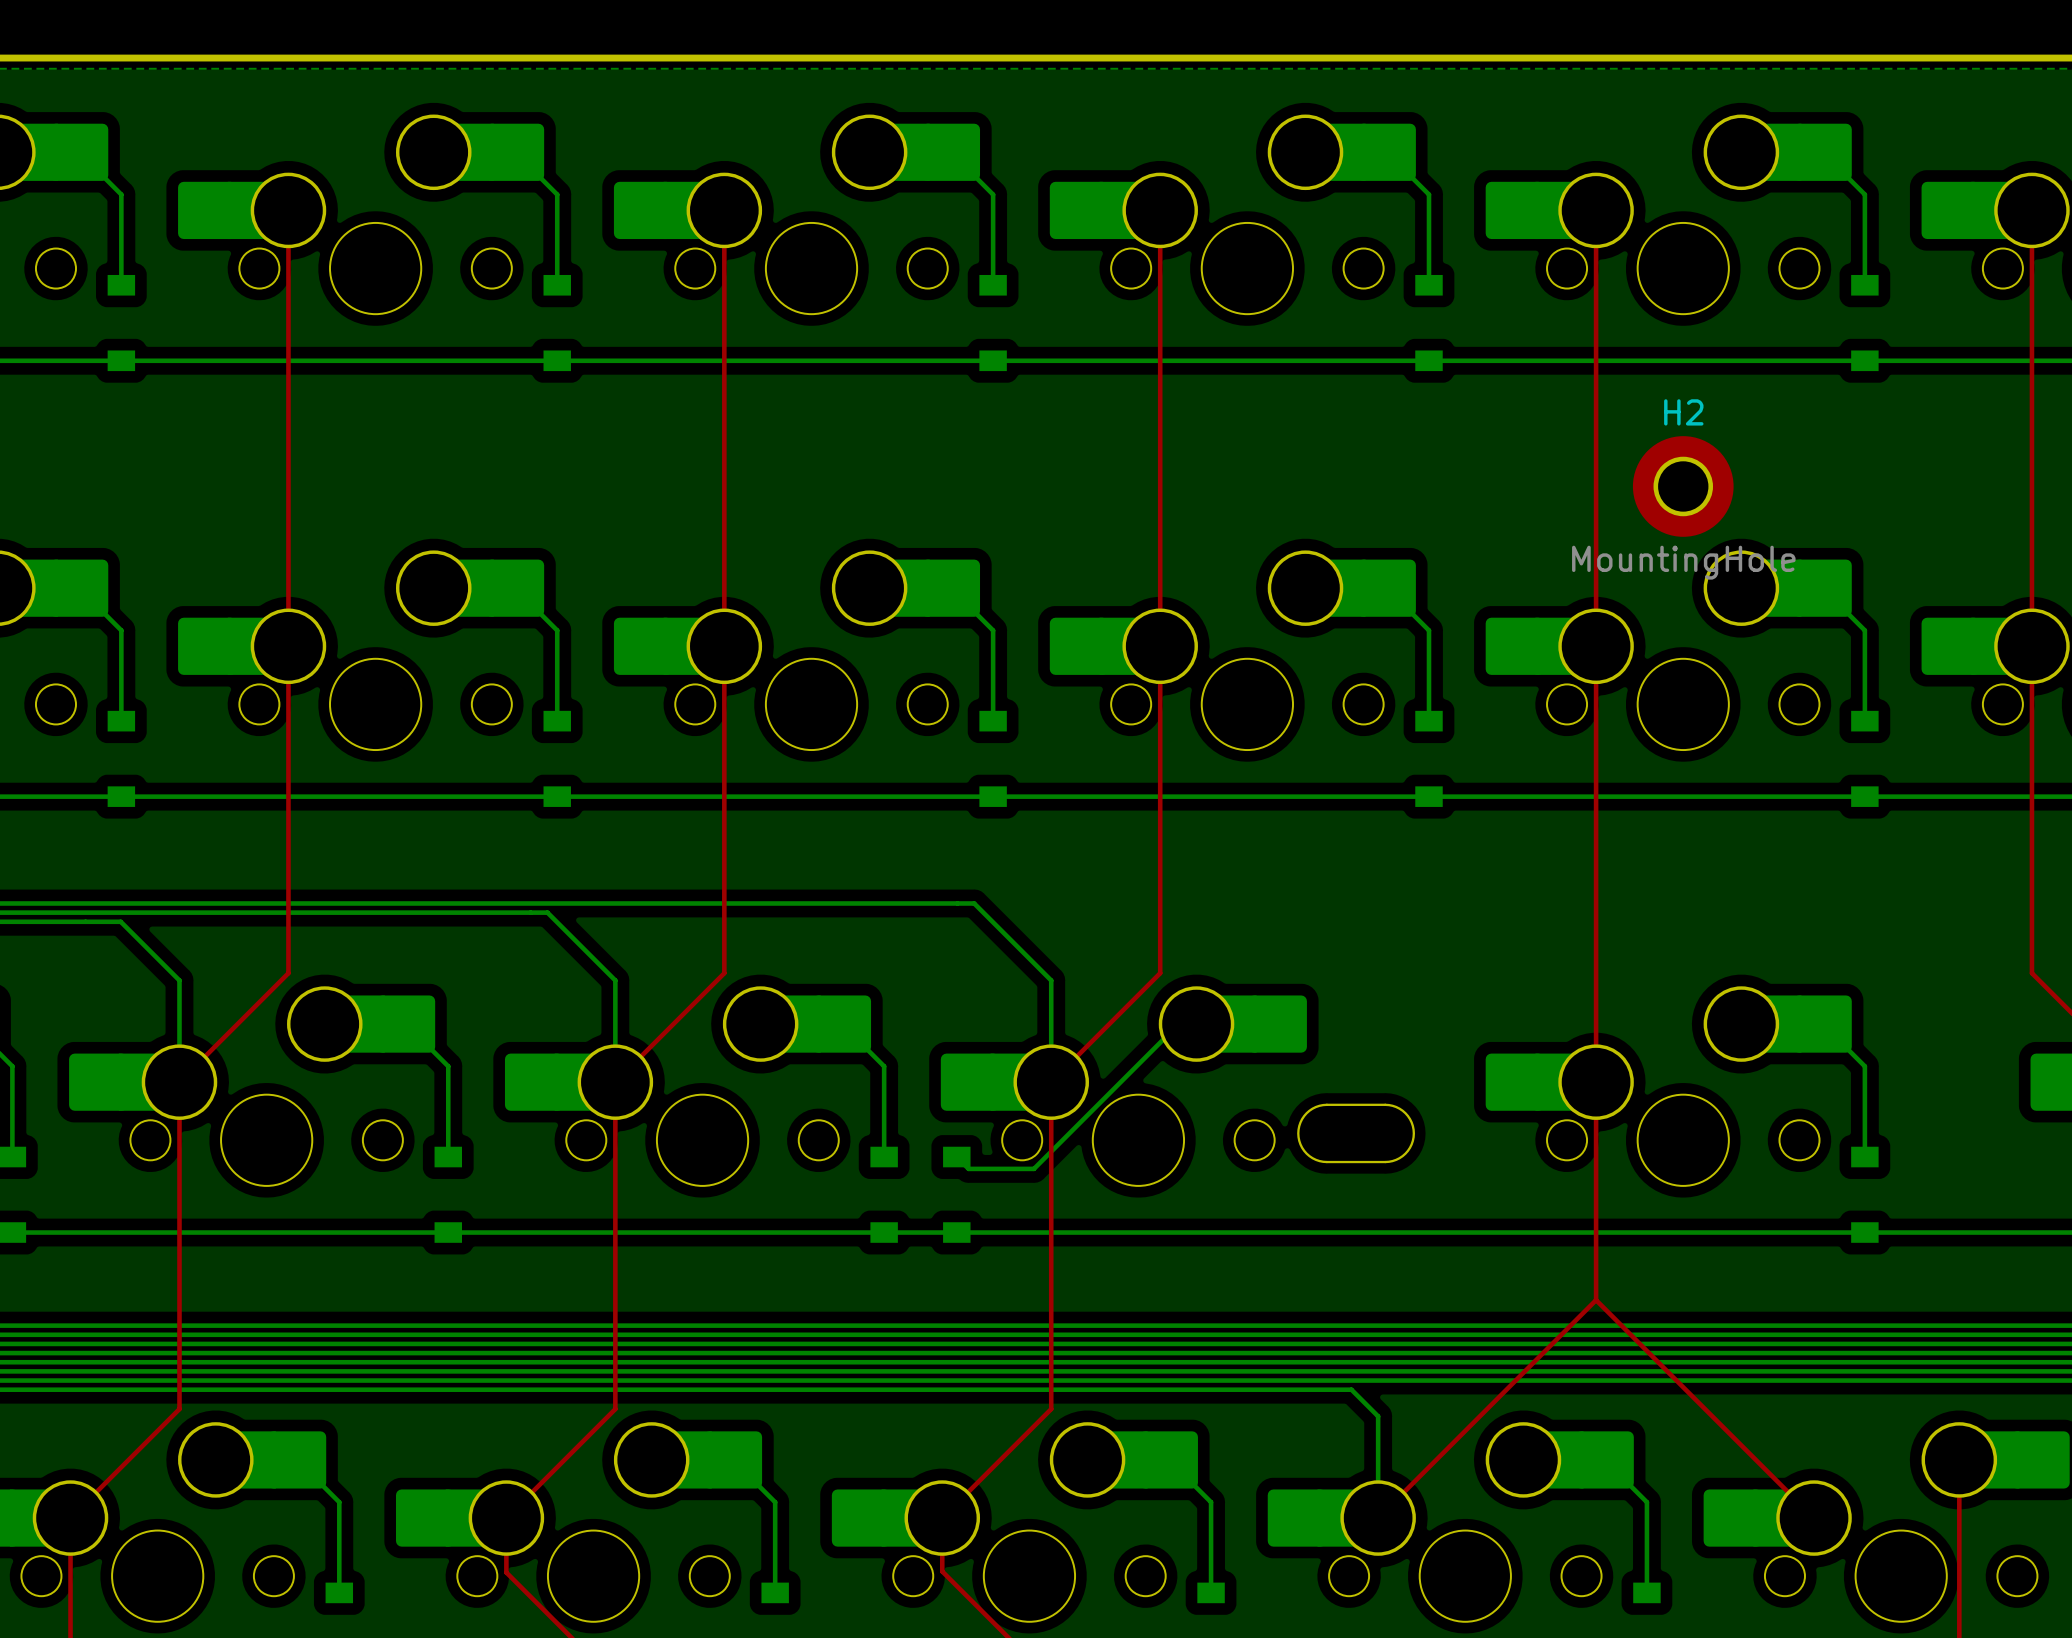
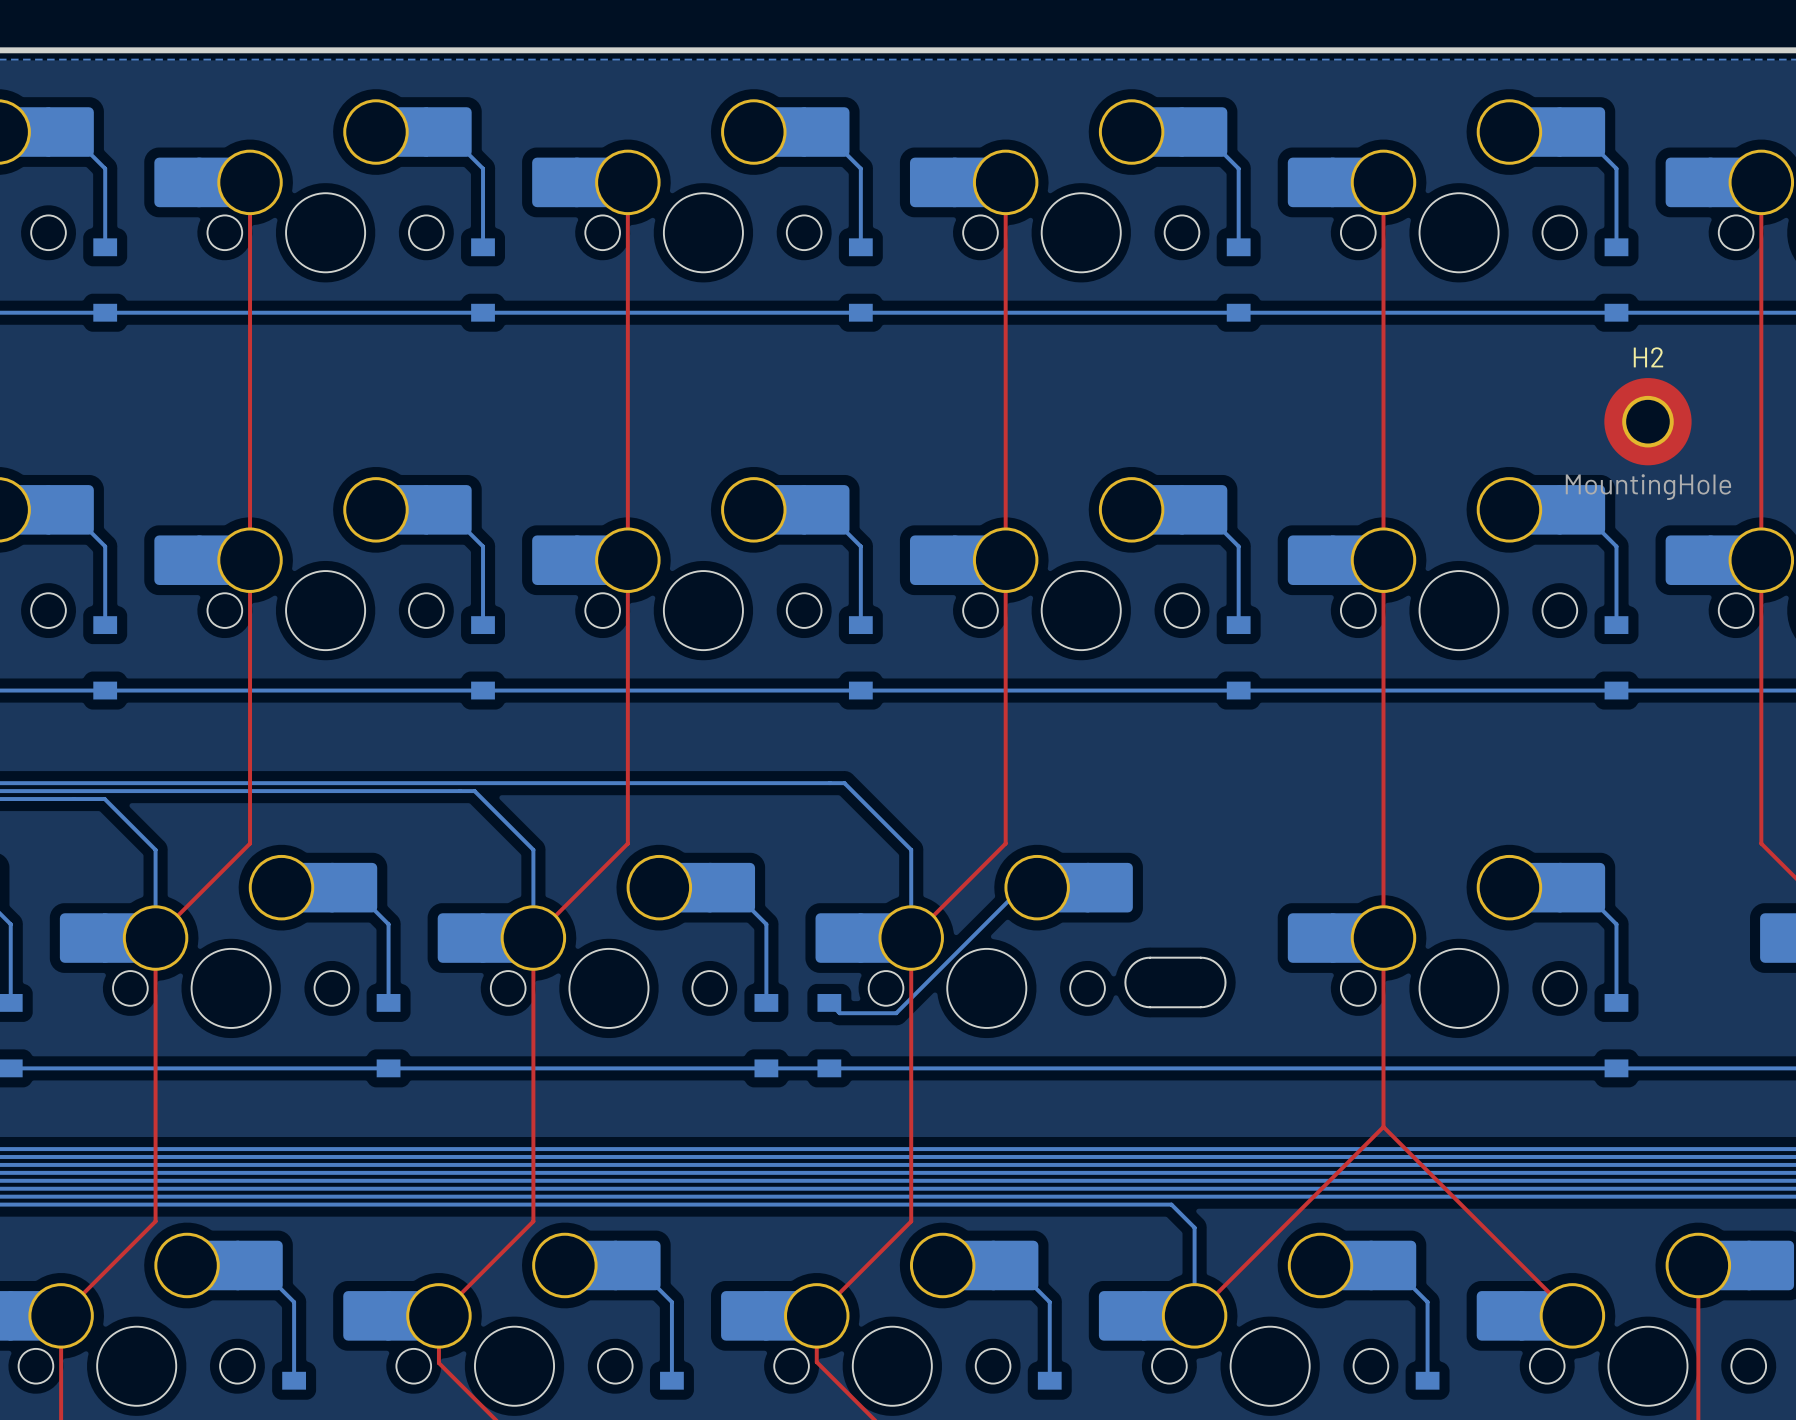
H2 position: (1683, 486) -> (1647, 421)

